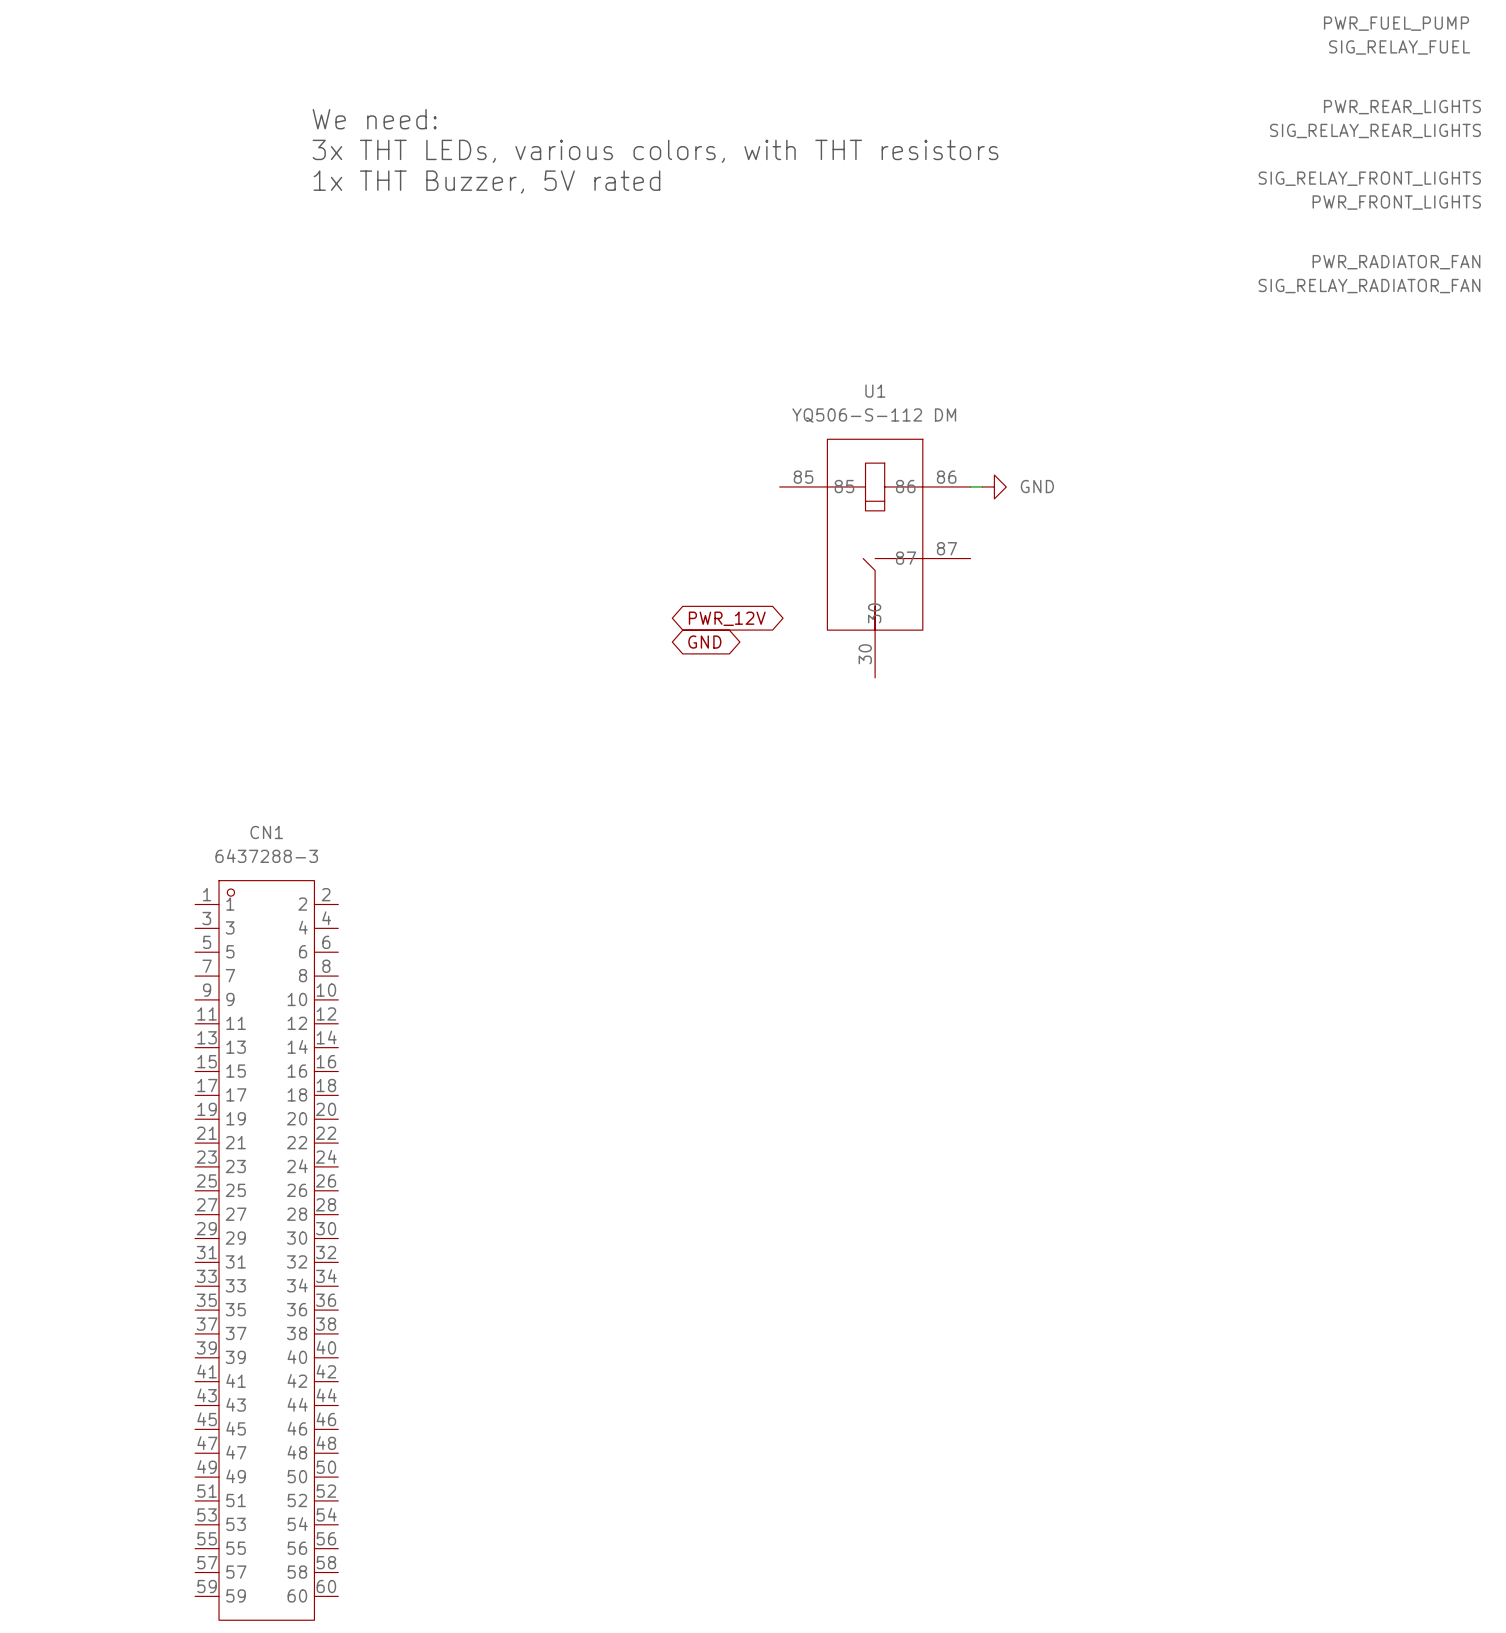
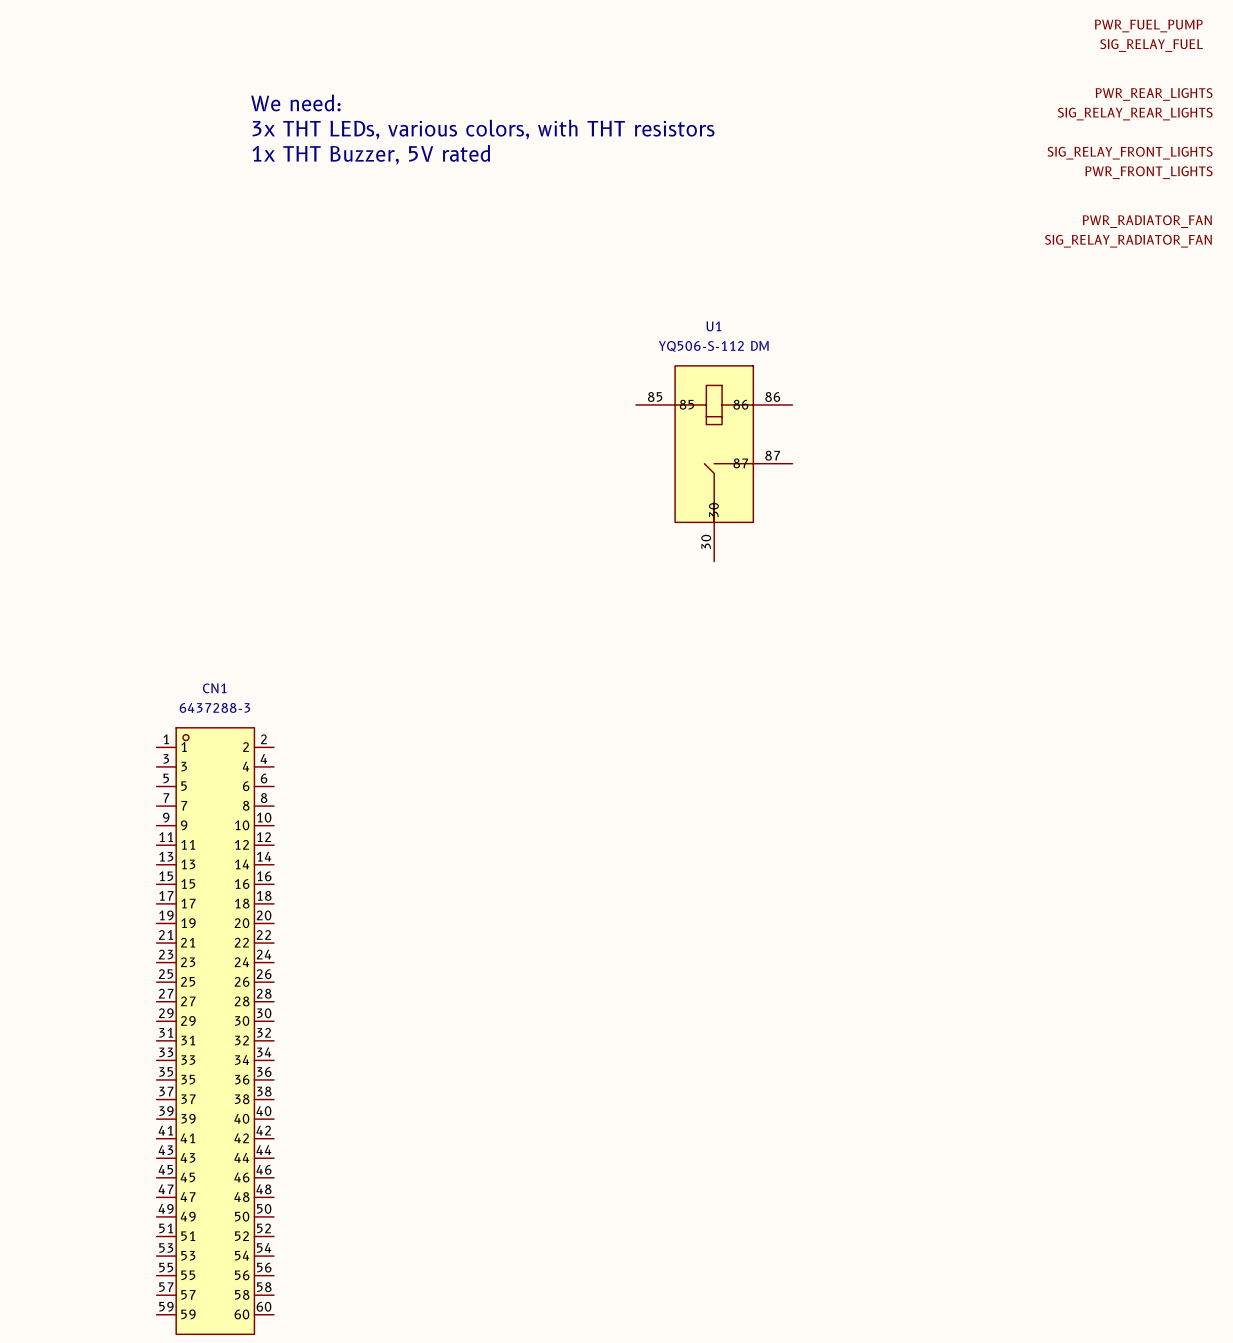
wire: (970, 486) (982, 486) -> none
power symbol: GND (994, 486) -> none
global label: PWR_12V (727, 618) -> none
global label: GND (704, 642) -> none

